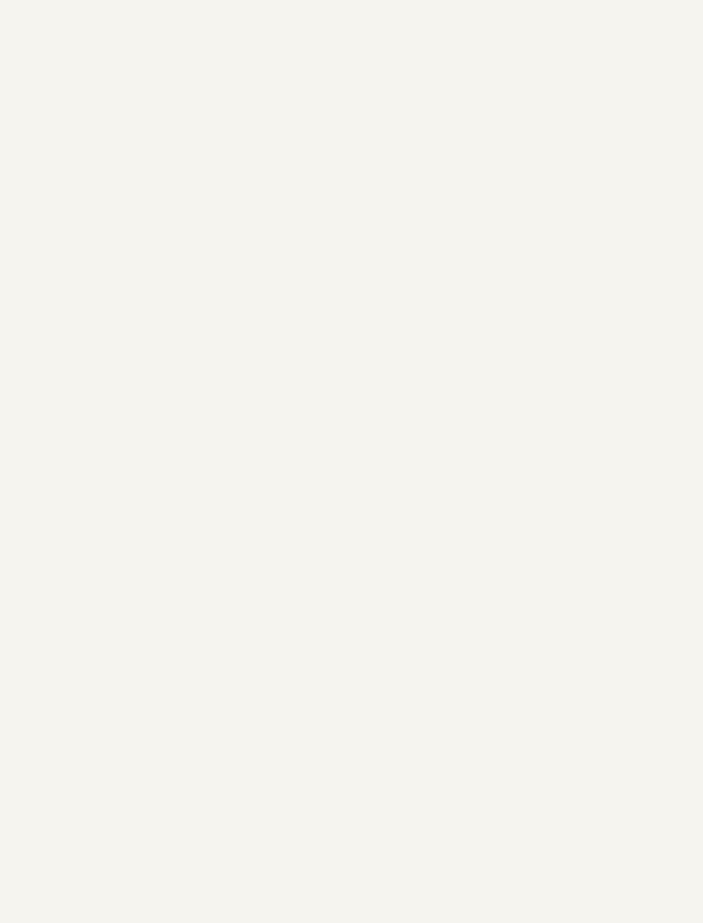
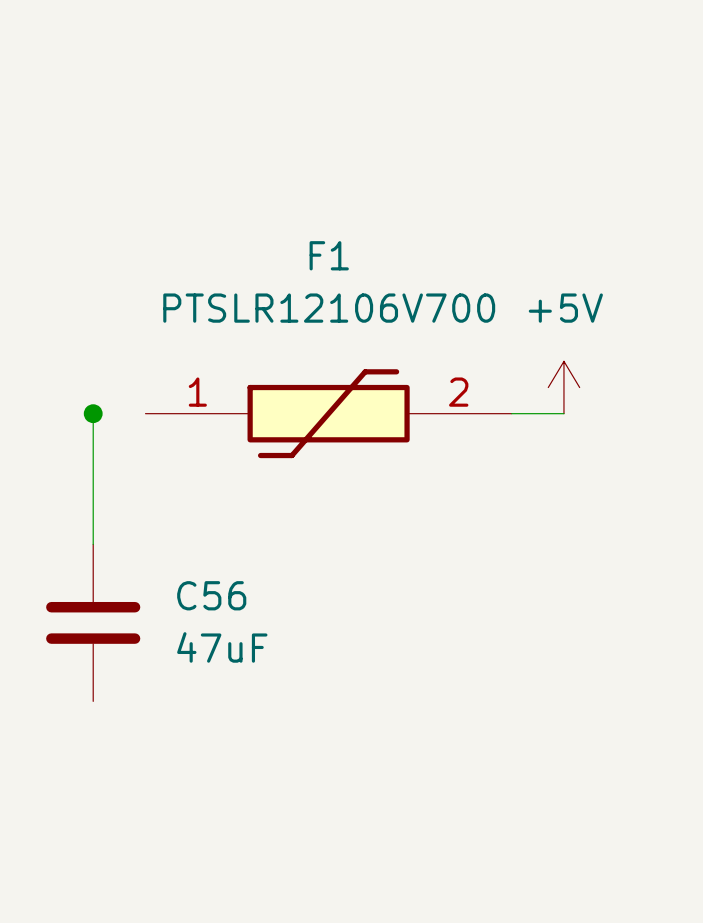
power symbol: none -> +5V (563, 387)
wire: none -> (93, 413) (93, 544)
junction: none -> (93, 413)
F1: none -> PTSLR12106V700 (328, 413)
wire: none -> (511, 413) (563, 413)
C56: none -> 47uF (93, 622)

